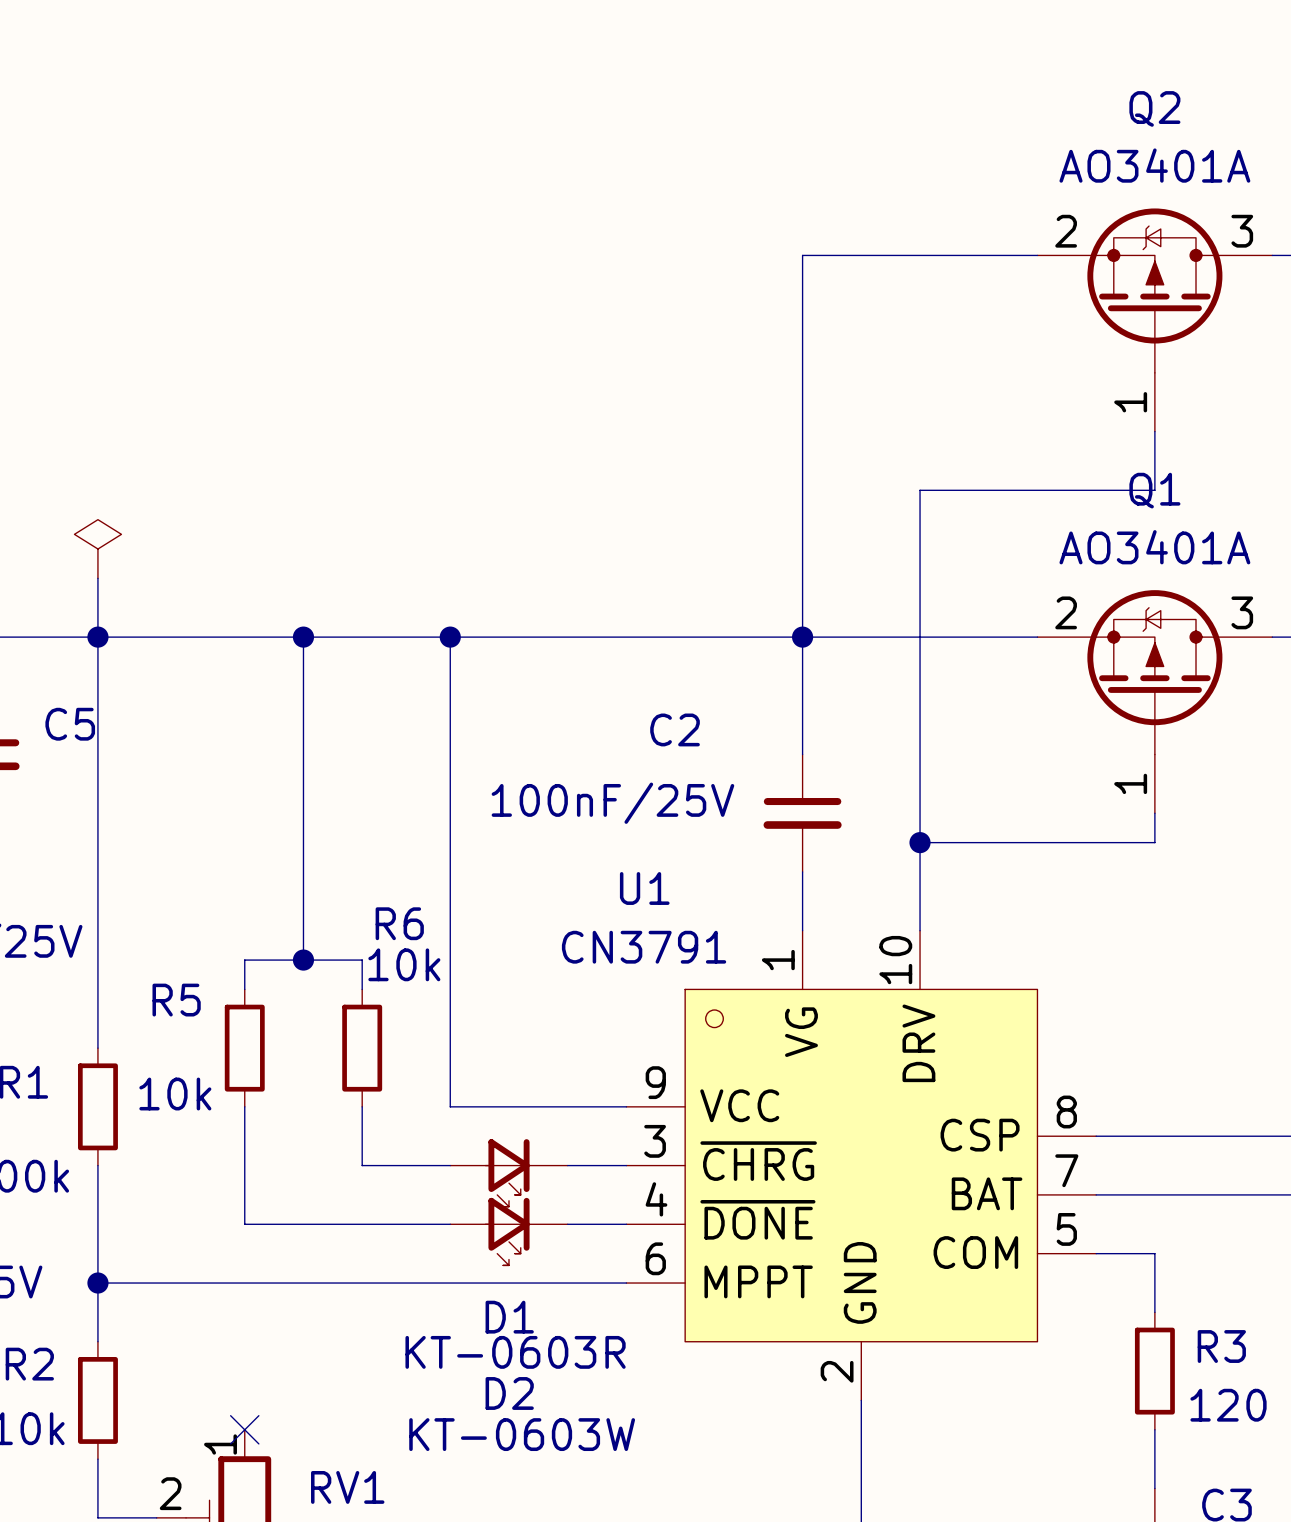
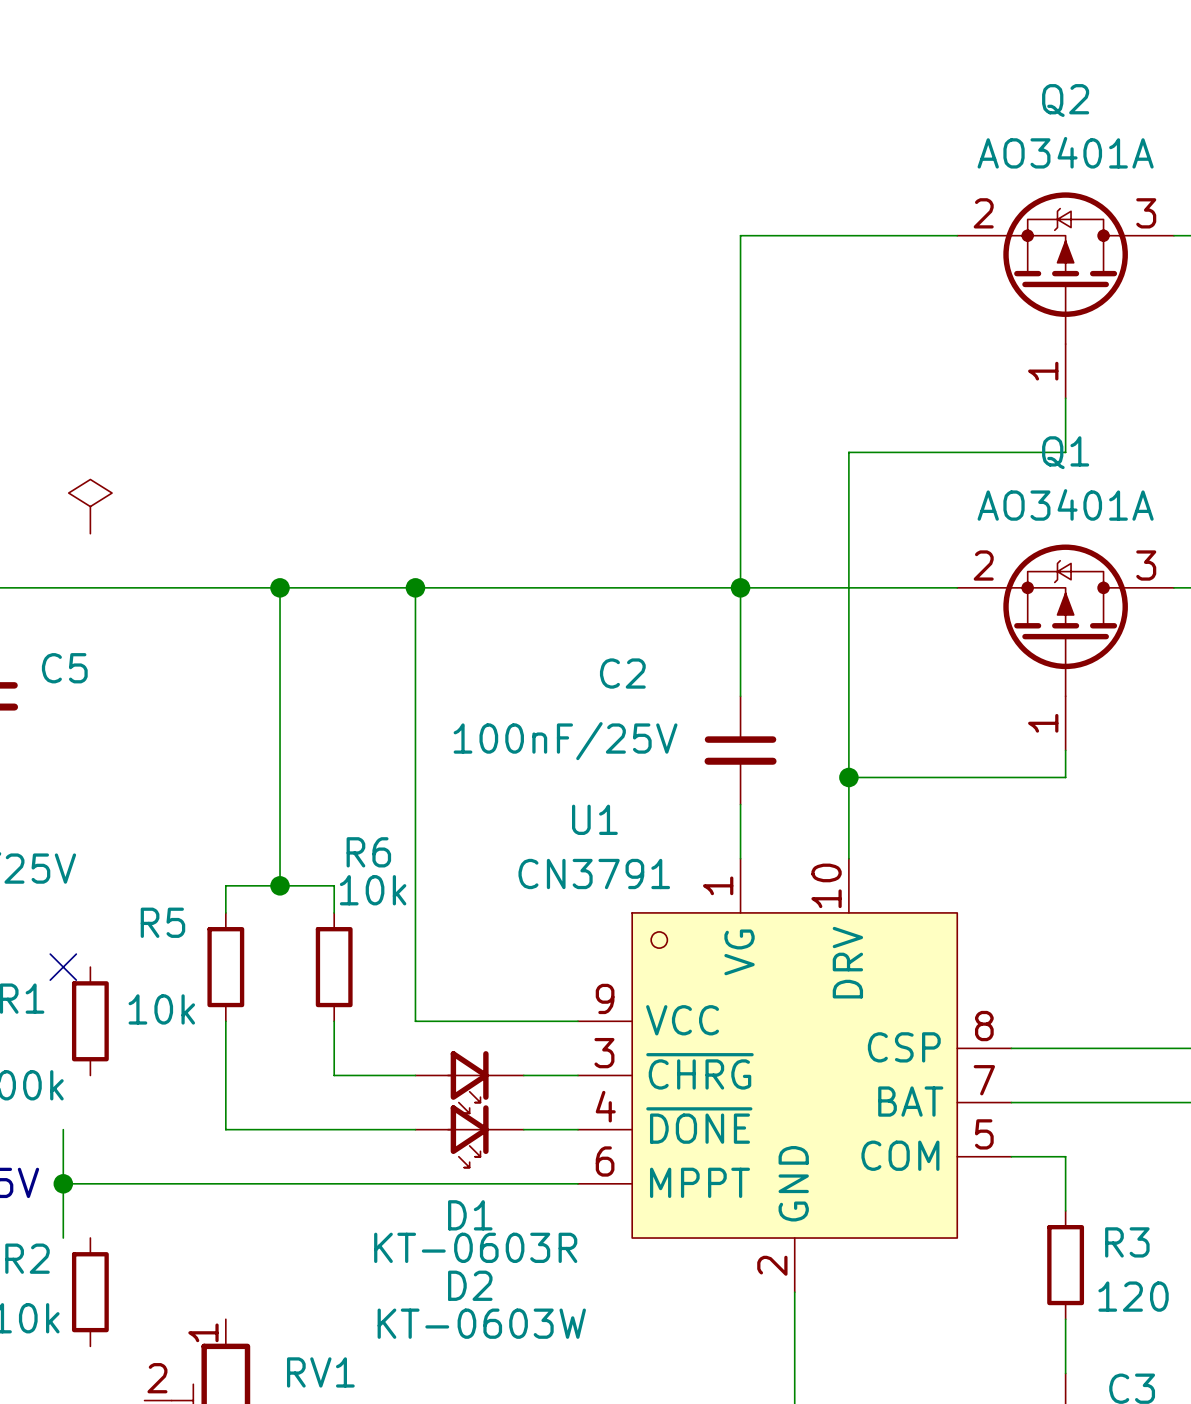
wire: (97, 578) (97, 1048) -> none
junction: (97, 637) -> none
no-connect mark: none -> (63, 967)
wire: (97, 1165) (97, 1341) -> none
wire: none -> (63, 1129) (63, 1238)
wire: none -> (63, 1183) (90, 1183)
junction position: (97, 1283) -> (63, 1183)
no-connect mark: (244, 1429) -> none
wire: (97, 1459) (97, 1517) (156, 1517) -> none

